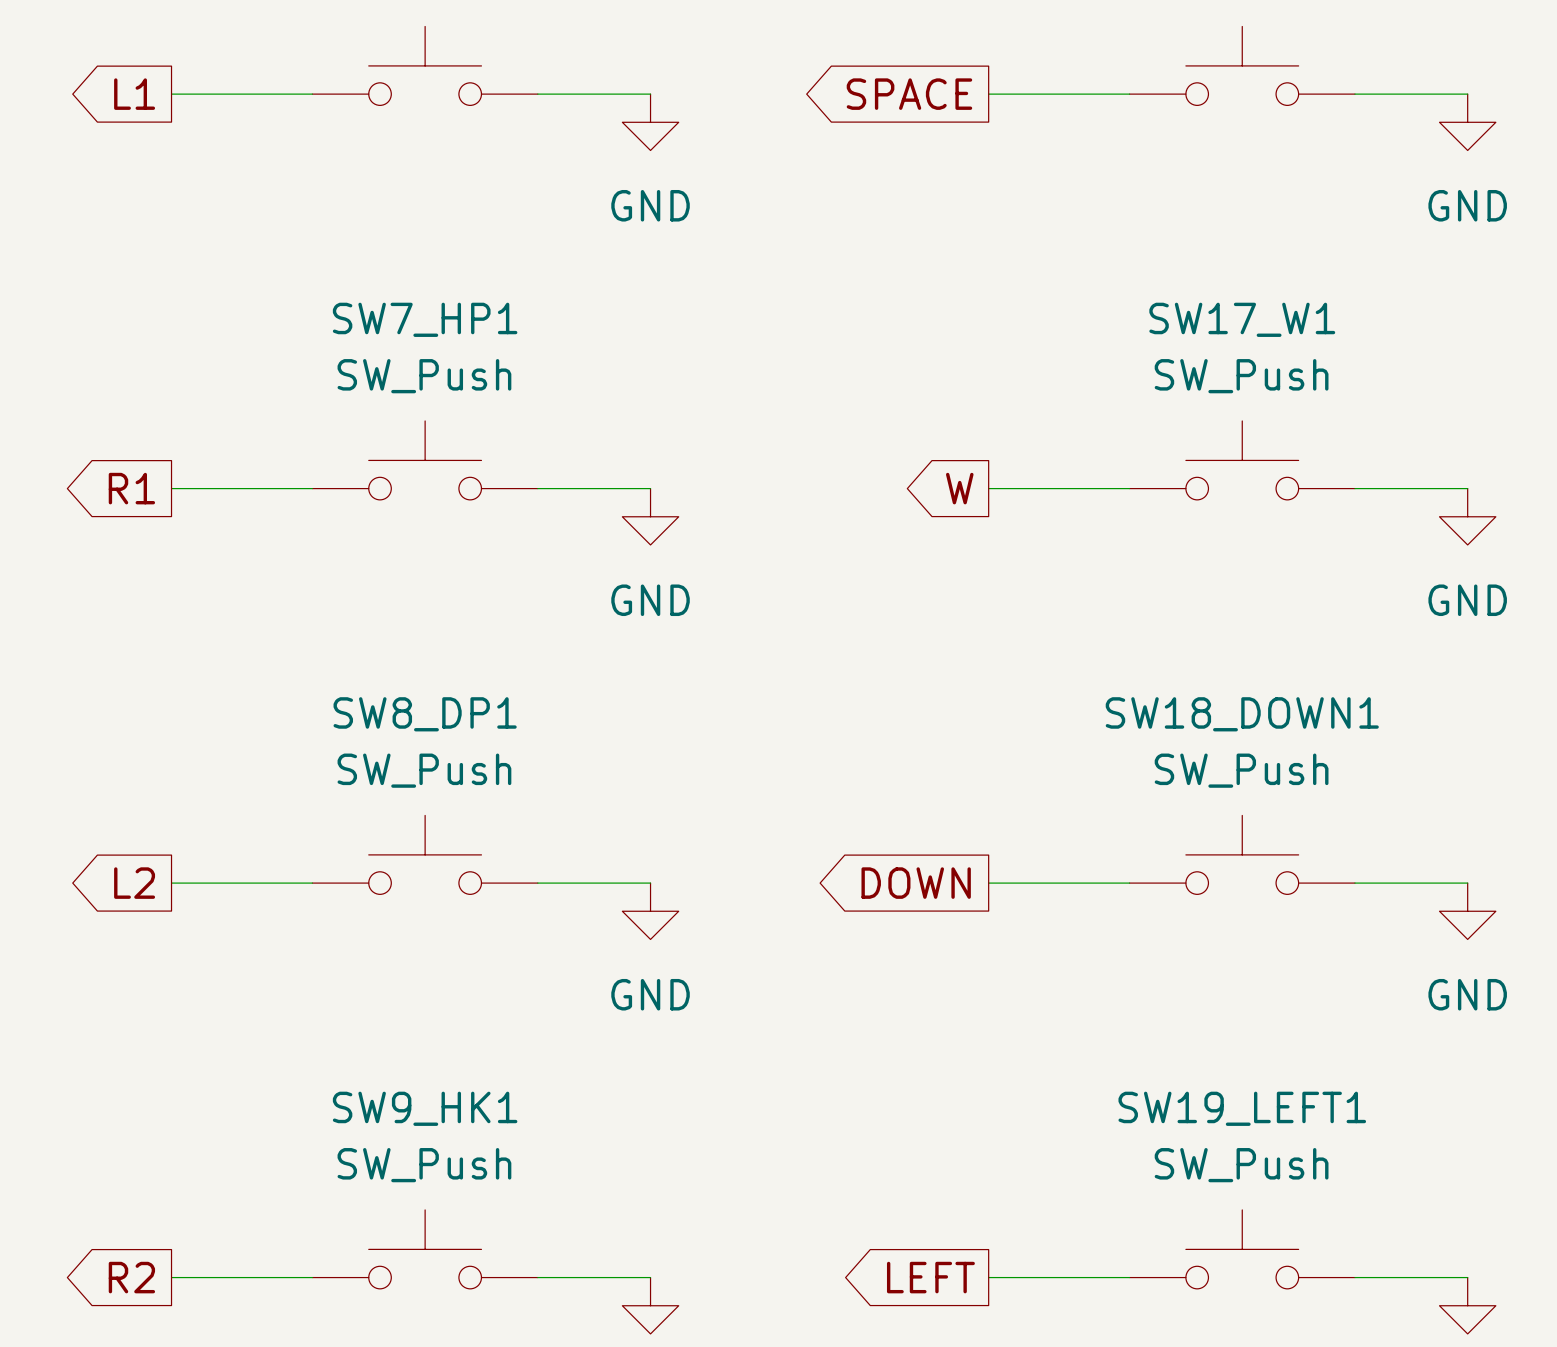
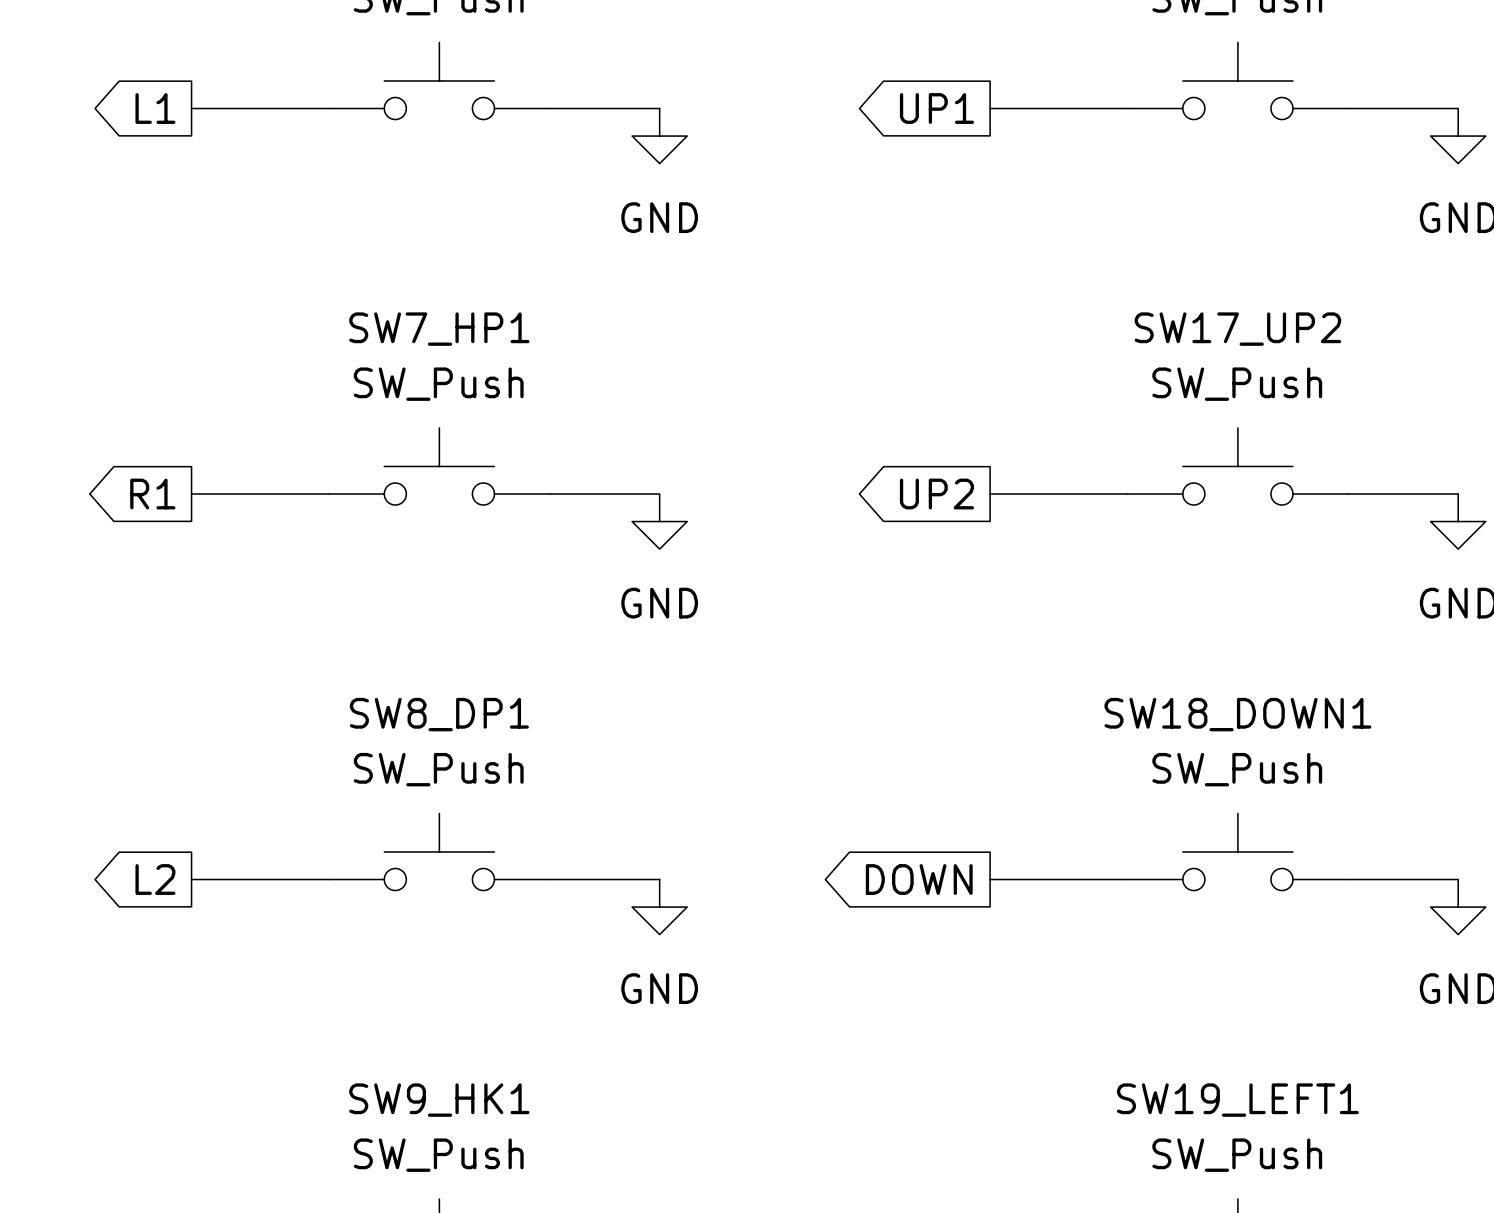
global label: SPACE (909, 94) -> UP1 (936, 108)
SW17_W1 name: SW17_W1 (1242, 319) -> SW17_UP2 (1237, 329)
global label: W (959, 488) -> UP2 (936, 494)

